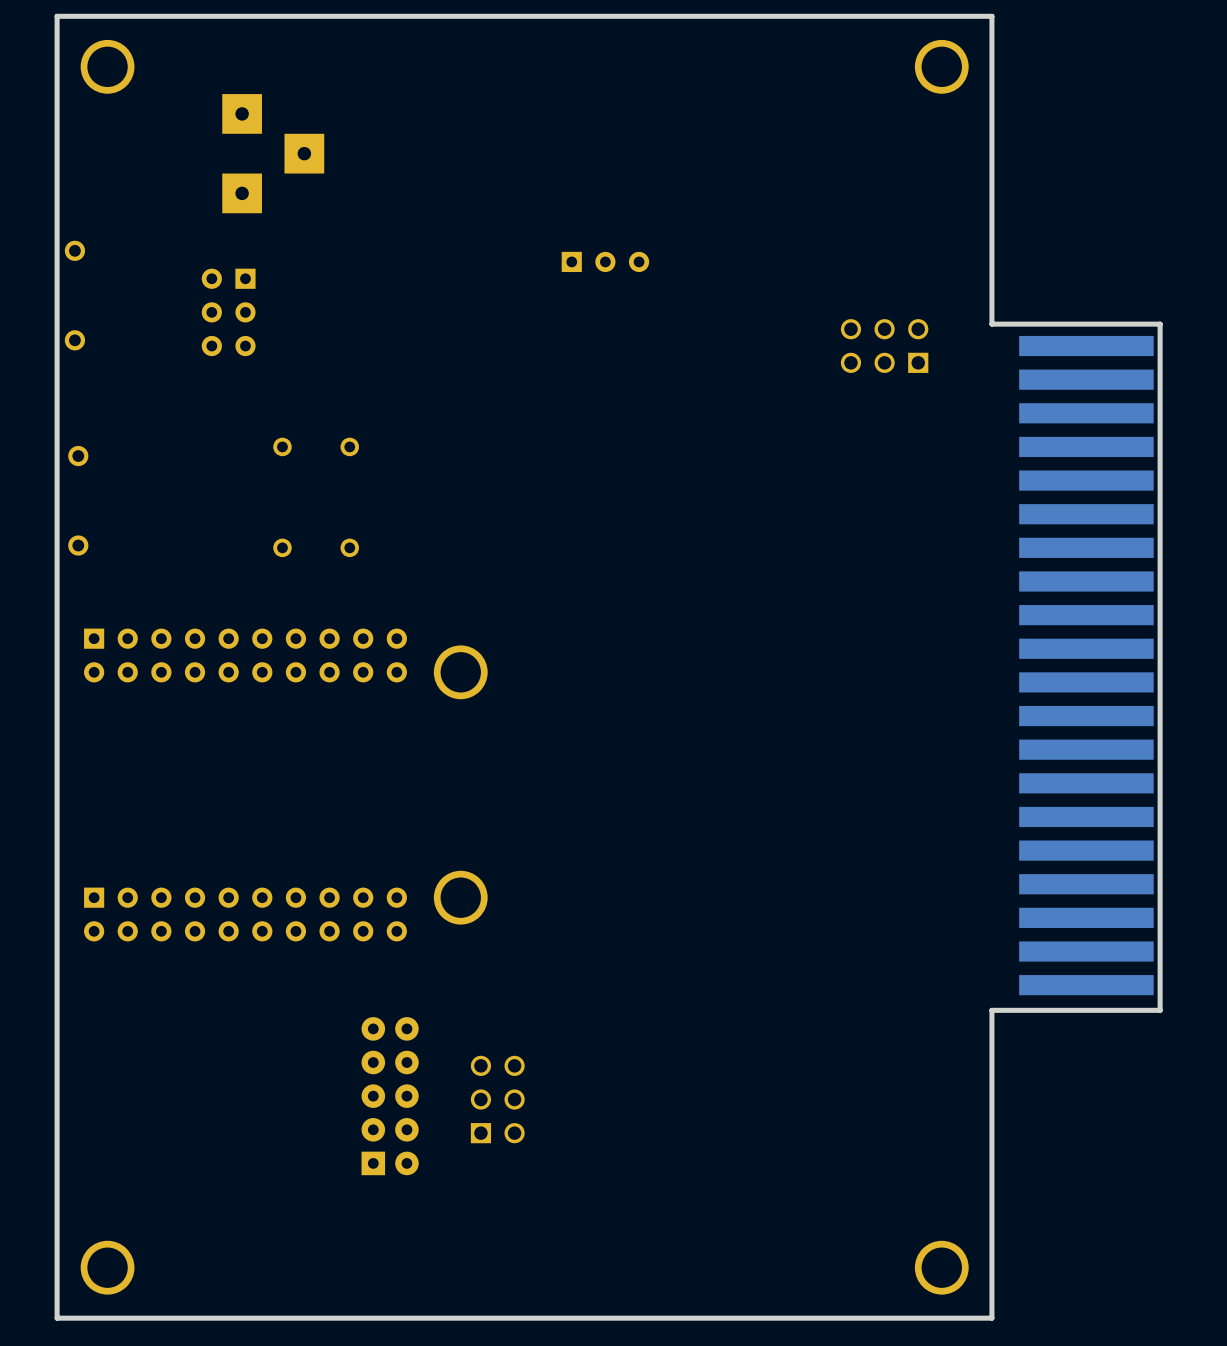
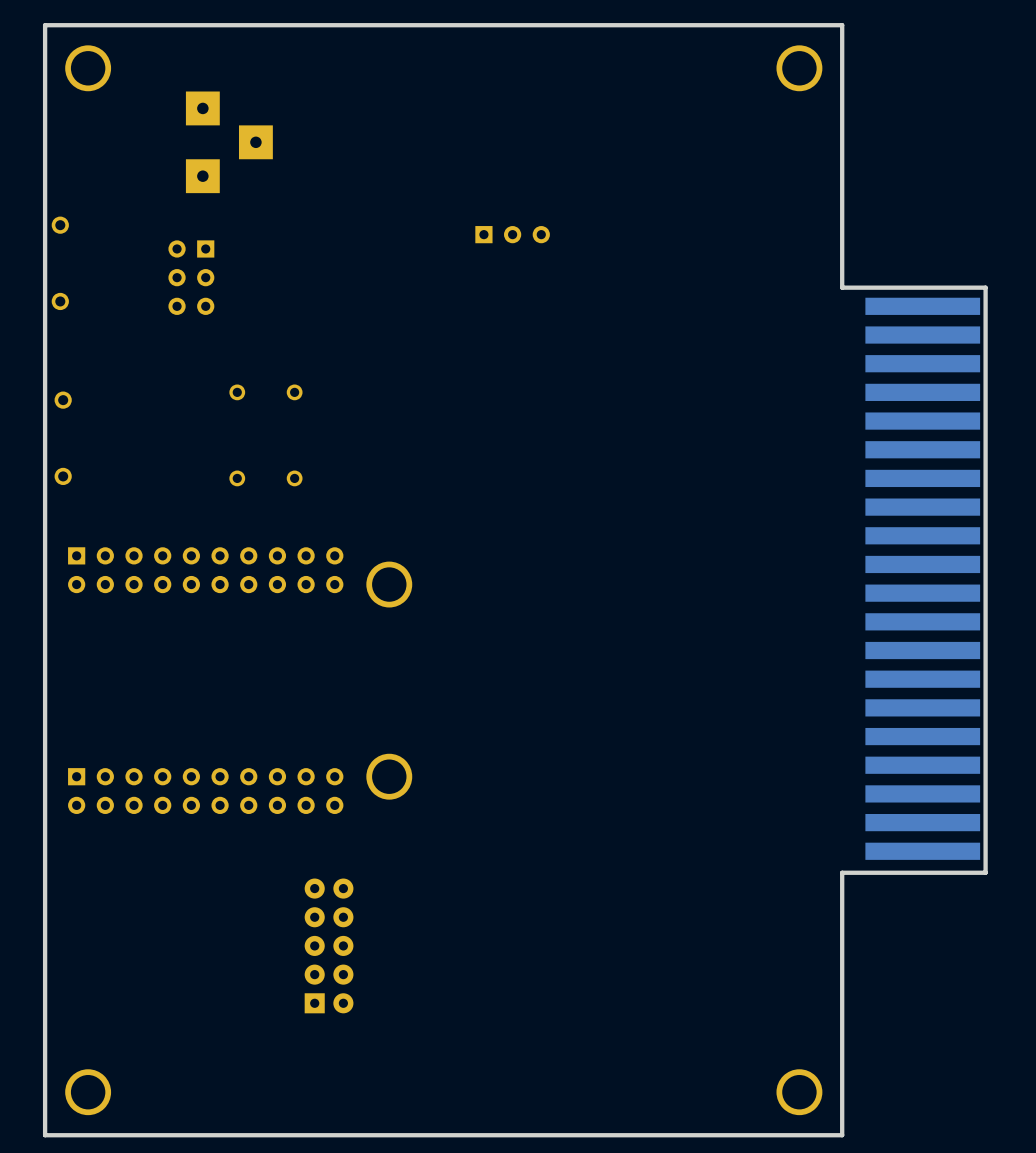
part: (884, 346) -> none
part: (497, 1099) -> none

